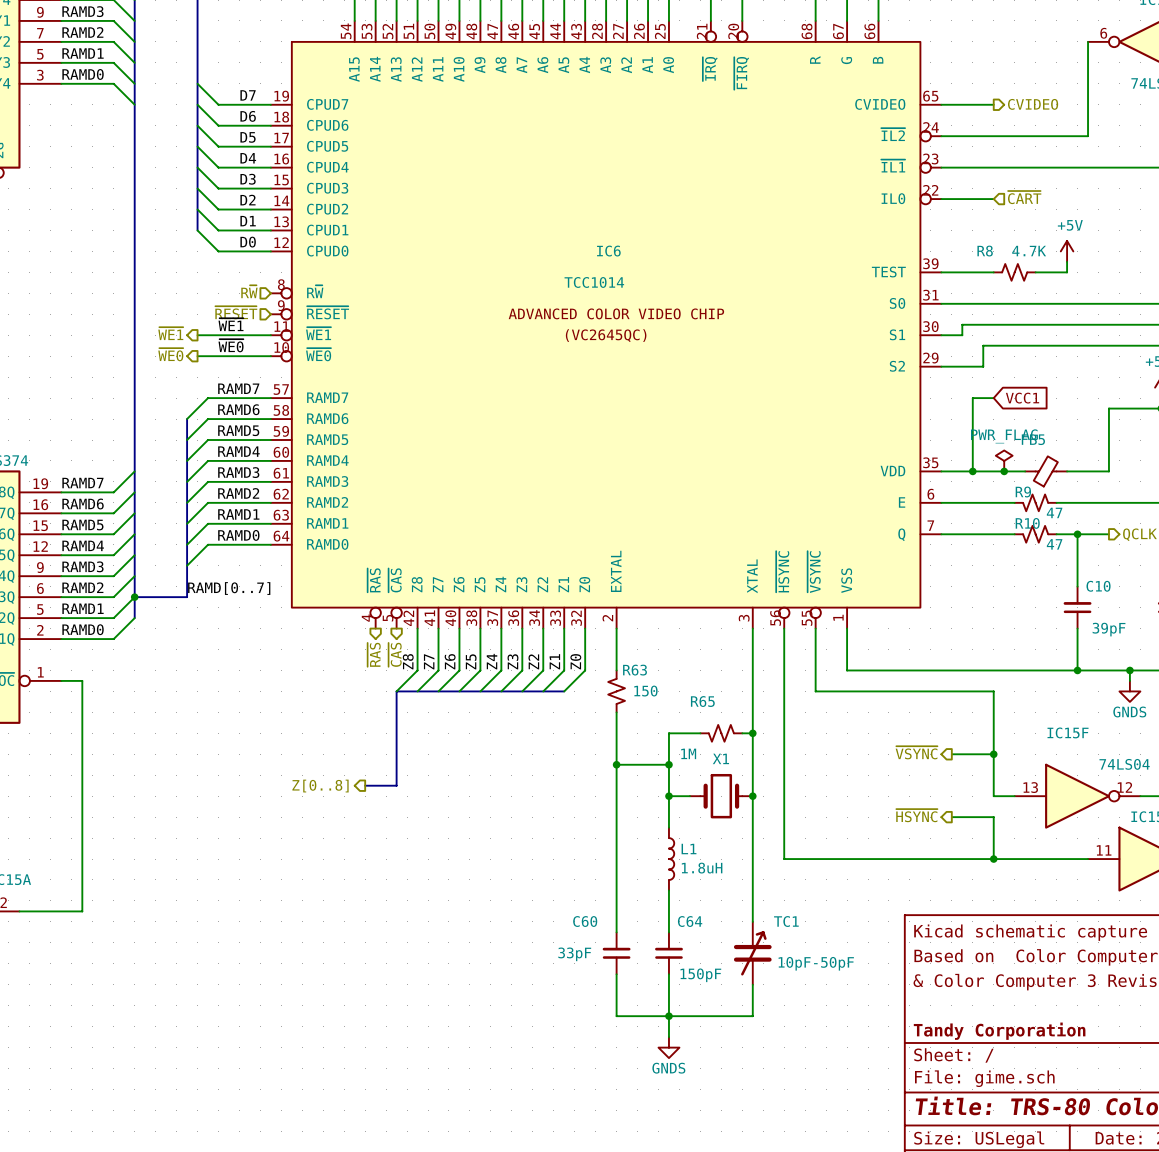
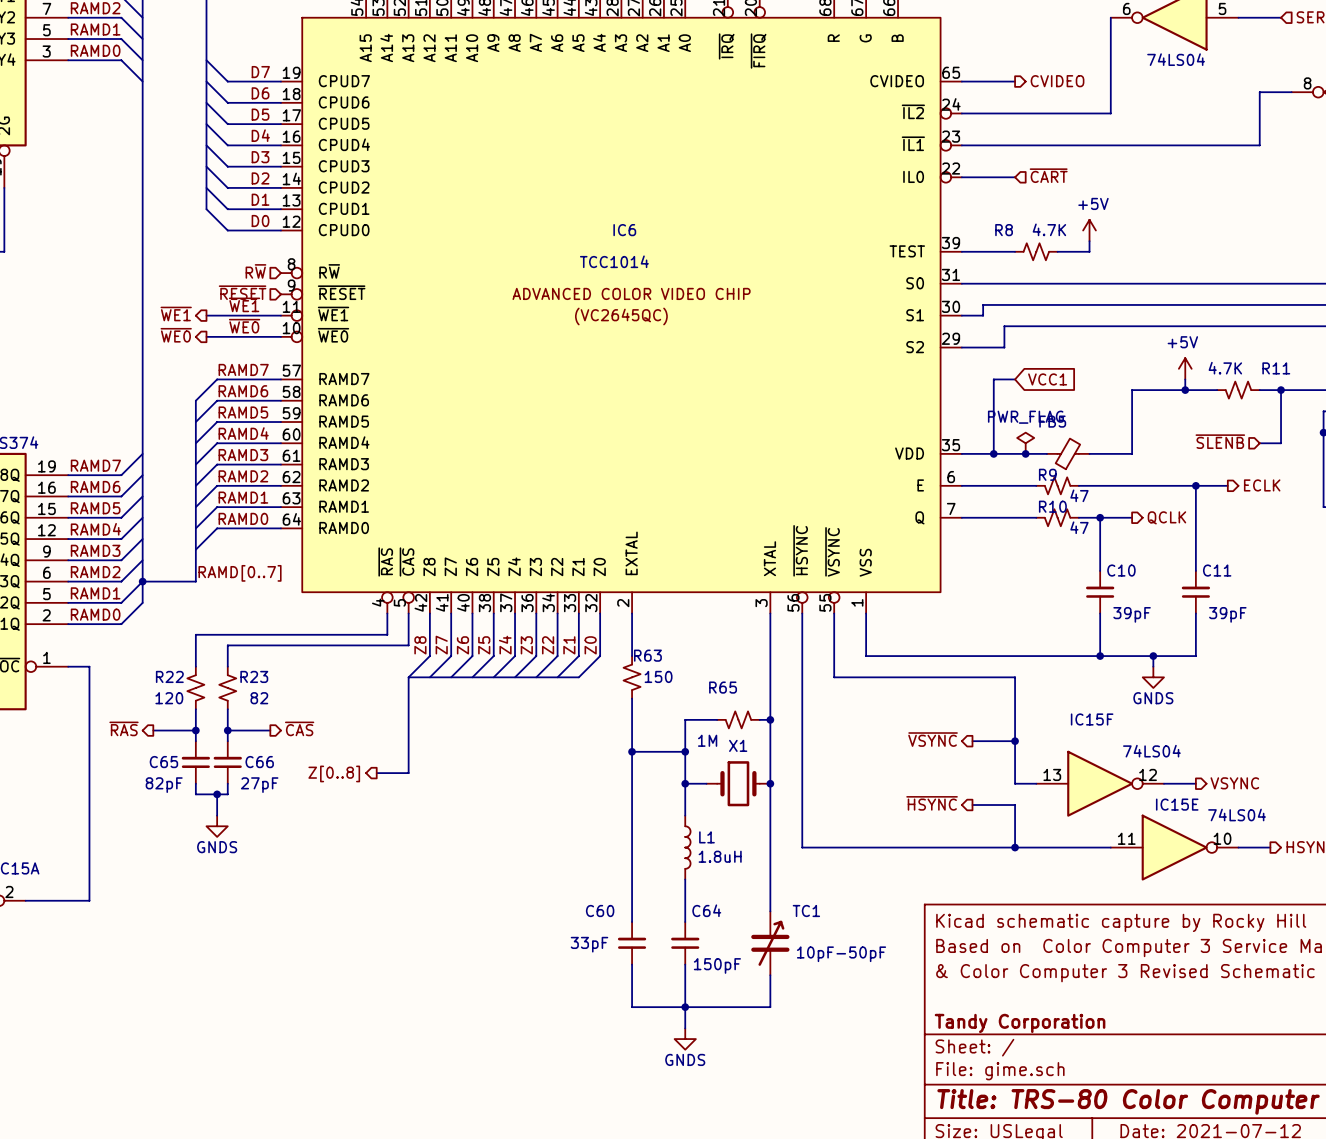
wire: none -> (387, 613) (387, 634) (195, 634) (195, 666)
wire: none -> (408, 613) (408, 645) (227, 645) (227, 666)
hierarchical label: ~{RAS} (374, 654) -> none
hierarchical label rotation: 0° (395, 654) -> 90° counterclockwise (299, 728)
hierarchical label position: ~{CAS} (395, 654) -> ~{CAS} (299, 728)
R22: none -> 120 (195, 687)
R23: none -> 82 (227, 687)
wire: none -> (195, 709) (195, 741)
wire: none -> (227, 709) (227, 741)
hierarchical label: none -> ~{RAS} (124, 728)
wire: none -> (153, 730) (195, 730)
junction: none -> (195, 730)
wire: none -> (227, 730) (270, 730)
junction: none -> (227, 730)
C65: none -> 82pF (195, 762)
C66: none -> 27pF (227, 762)
wire: none -> (195, 783) (195, 794) (227, 794) (227, 783)
wire: none -> (217, 794) (217, 815)
junction: none -> (217, 794)
power symbol: none -> GNDS (217, 826)

